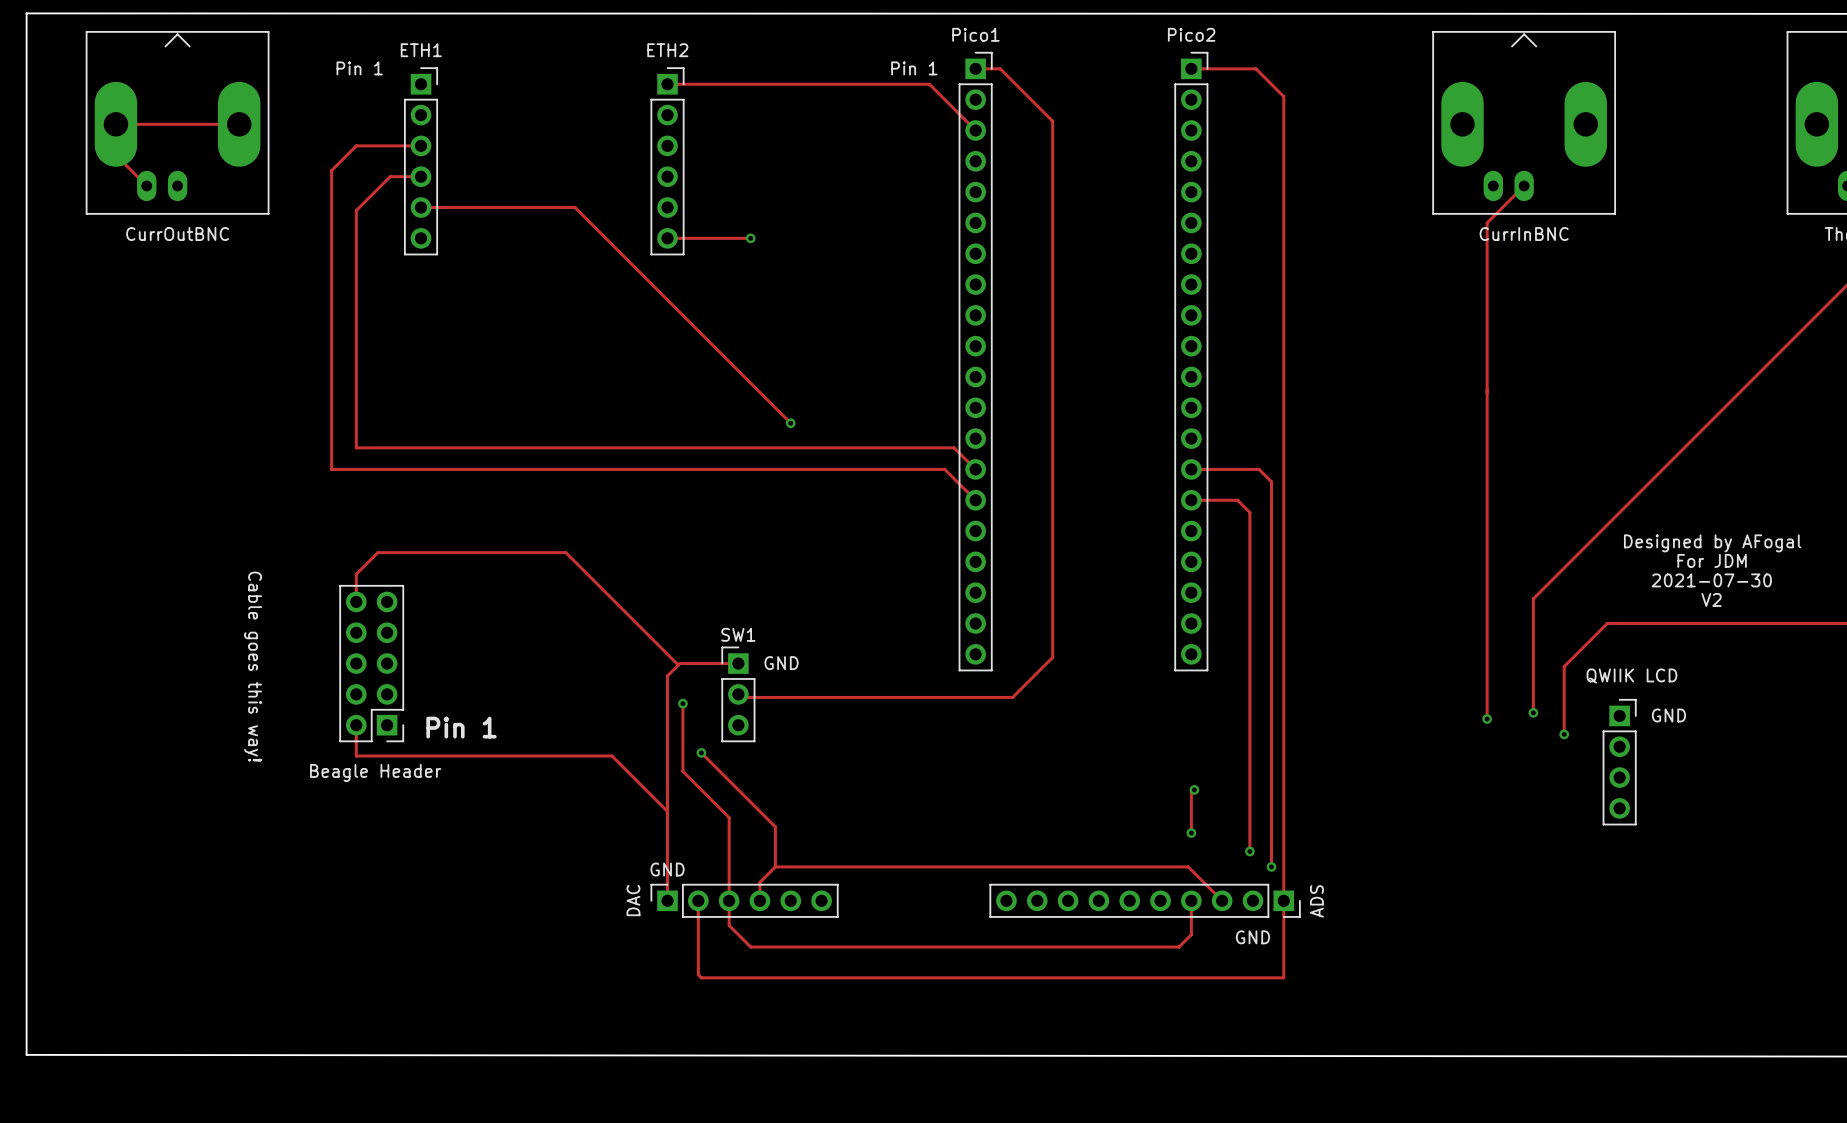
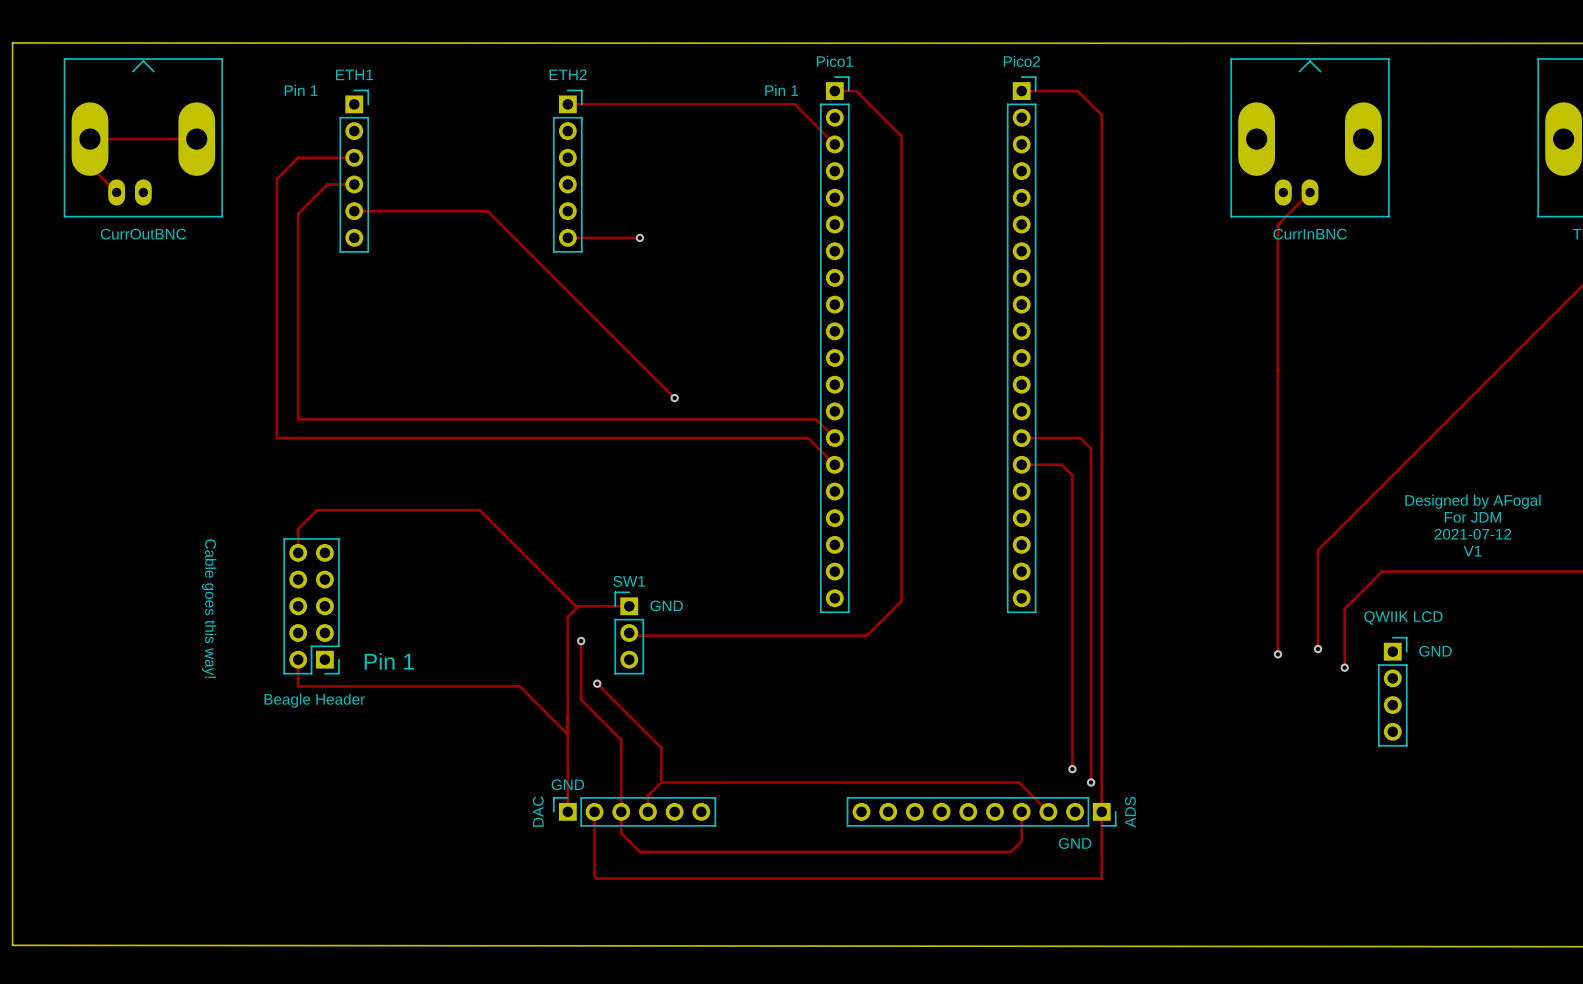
text: 2021-07-30 (1711, 580) -> 2021-07-12 (1472, 534)
text: V2 (1711, 599) -> V1 (1472, 551)
track: (1194, 789) (1191, 792) (1191, 833) -> none
via: (1194, 789) -> none
via: (1191, 833) -> none

